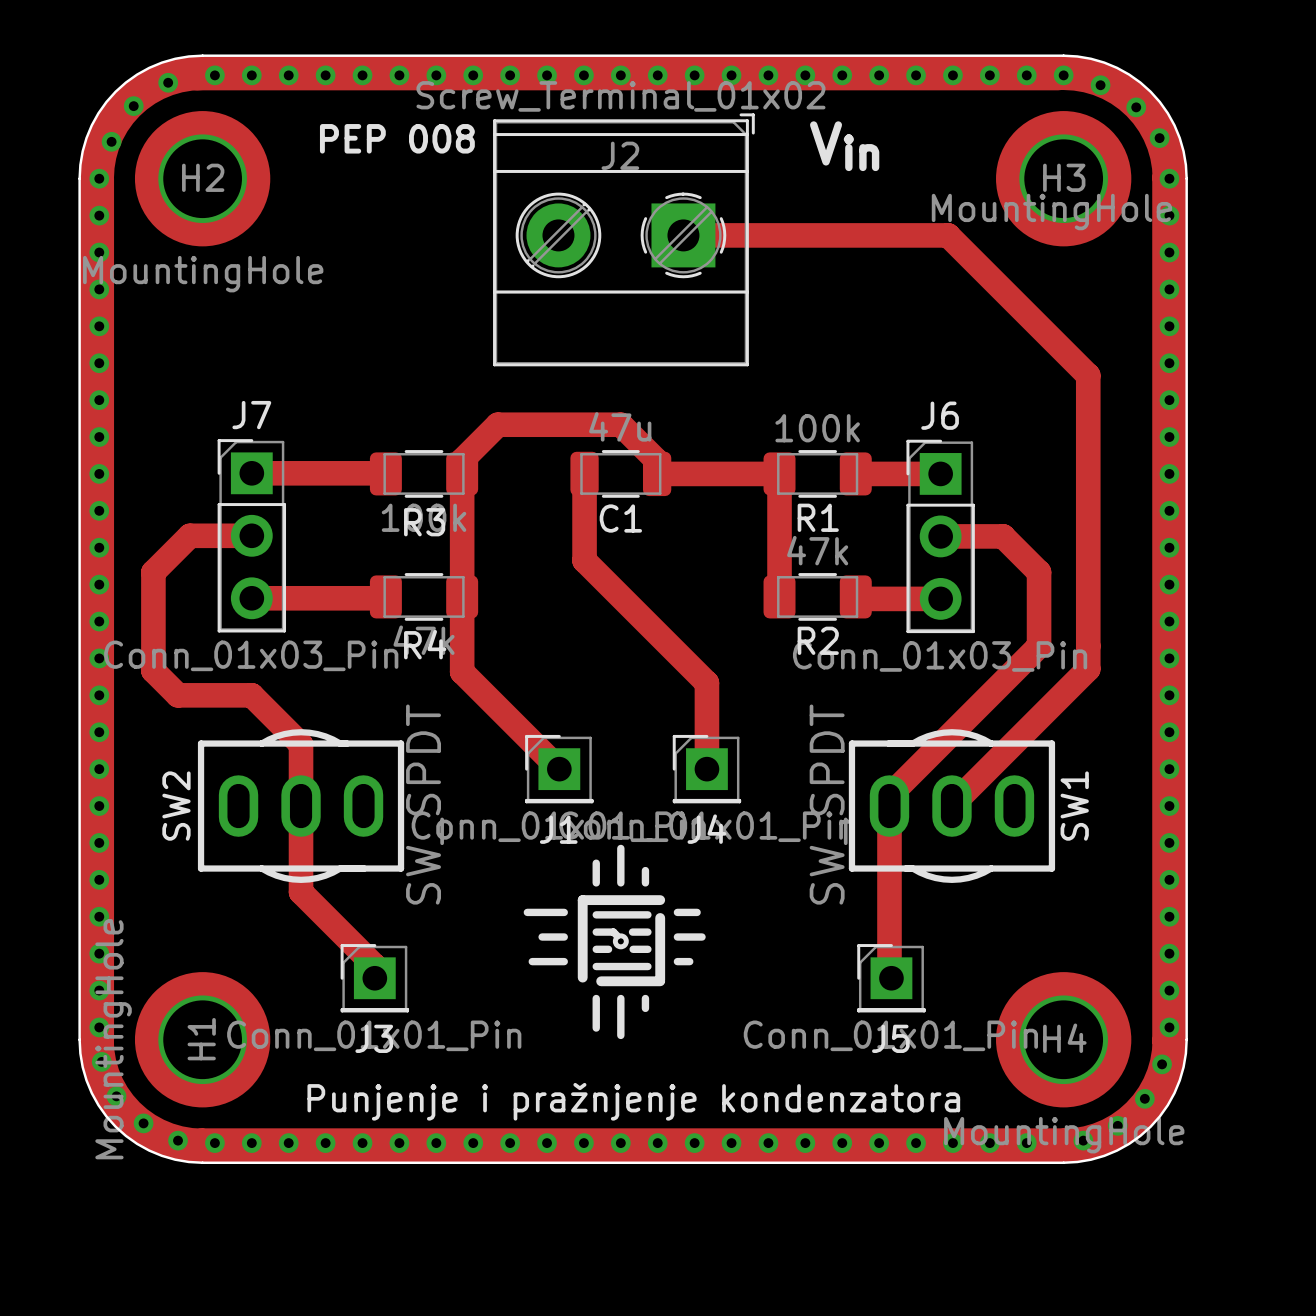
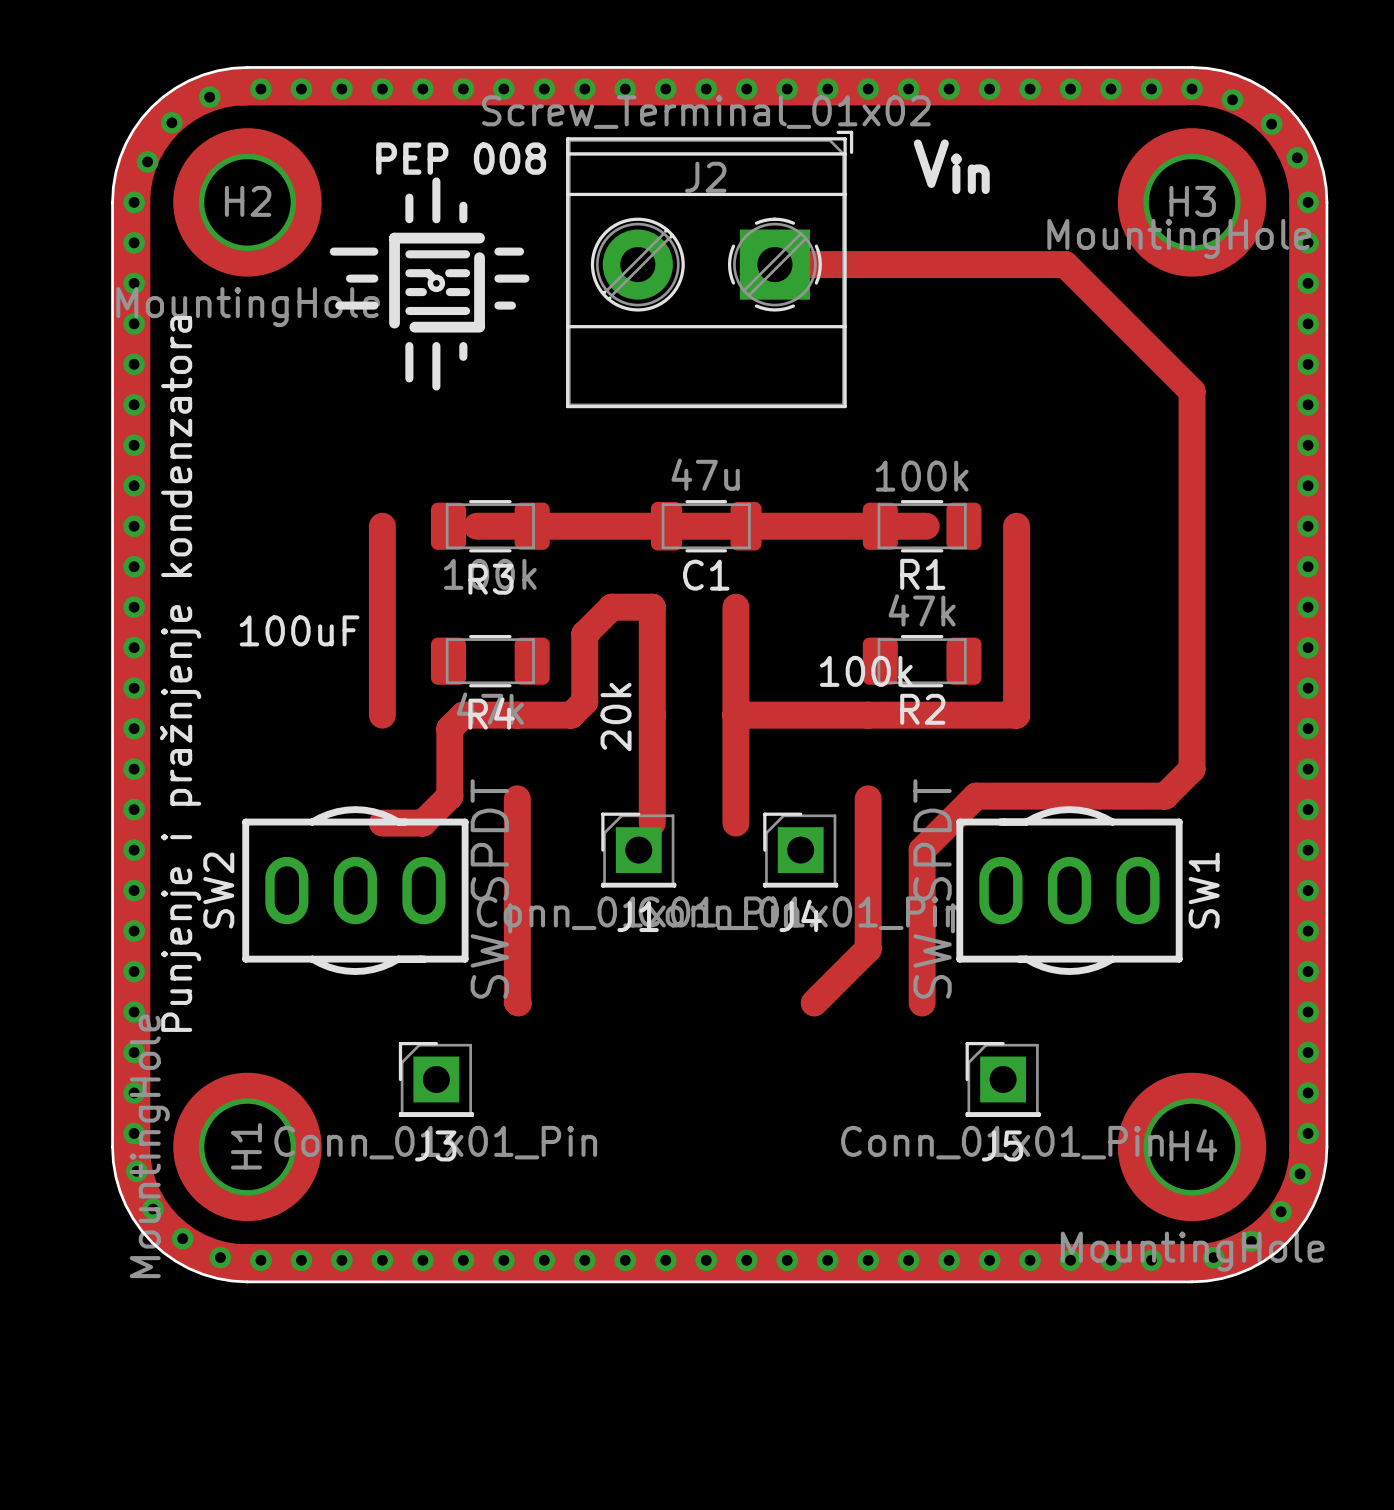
drawing: none -> [329, 177, 530, 391]
track: (1063, 350) (1088, 375) (1088, 668) (951, 806) -> (1192, 391) (1192, 769) (1165, 796) (976, 796) (922, 850) (922, 1003)
track: (251, 473) (385, 473) -> none
track: none -> (382, 526) (382, 715)
track: (584, 473) (584, 560) (706, 683) (706, 769) -> none
track: (657, 473) (657, 461) (620, 424) (497, 424) (462, 460) (462, 671) (559, 769) -> (746, 526) (476, 526)
track: (779, 473) (779, 596) -> (880, 526) (926, 526)
track: (855, 473) (940, 473) -> none
track: none -> (1016, 526) (1016, 715) (735, 715)
track: (251, 535) (189, 535) (153, 572) (153, 670) (178, 695) (251, 695) (301, 744) (301, 892) (374, 965) (374, 978) -> none
J7: Conn_01x03_Pin (251, 535) -> none
track: (940, 536) (1003, 536) (1039, 572) (1039, 646) (889, 795) (889, 976) (891, 978) -> none
J6: Conn_01x03_Pin (940, 536) -> none
track: none -> (735, 607) (735, 823)
text: none -> 100uF (299, 630)
track: (385, 596) (251, 598) -> none
track: (855, 596) (857, 598) (940, 598) -> none
text: none -> 100k (866, 671)
text: none -> 20k (616, 716)
track: none -> (517, 798) (518, 1003)
track: none -> (868, 798) (868, 949) (814, 1003)
track: none -> (382, 823) (422, 823) (449, 796) (449, 728) (463, 715) (571, 715) (584, 701) (584, 634) (611, 607) (652, 607) (652, 823)
drawing: [523, 844, 706, 1040] -> none
text rotation: 0° (633, 1101) -> 90° counterclockwise (180, 673)

